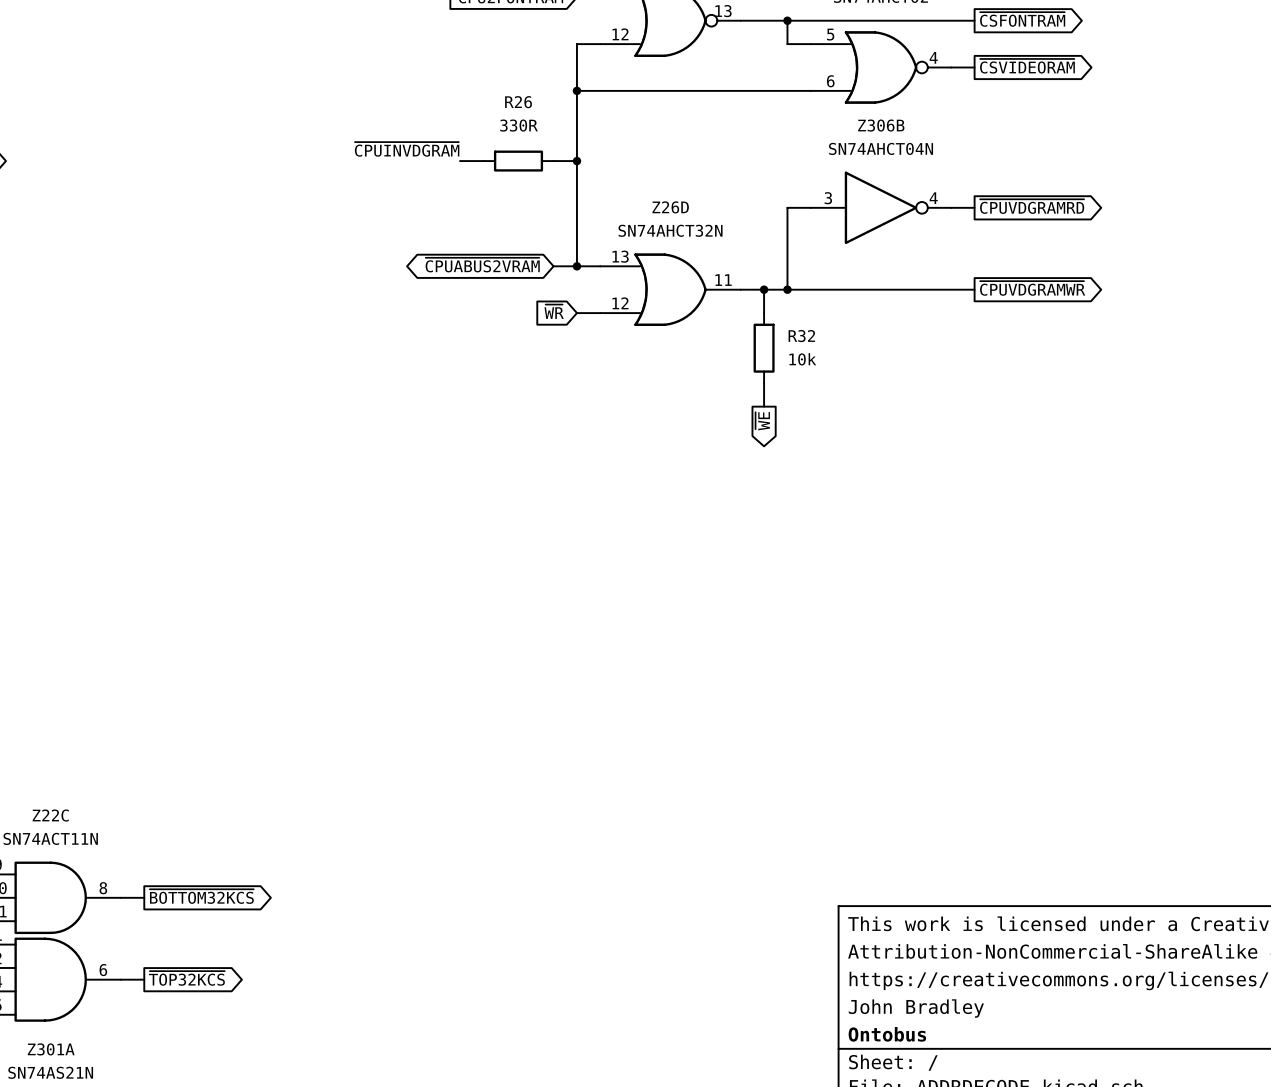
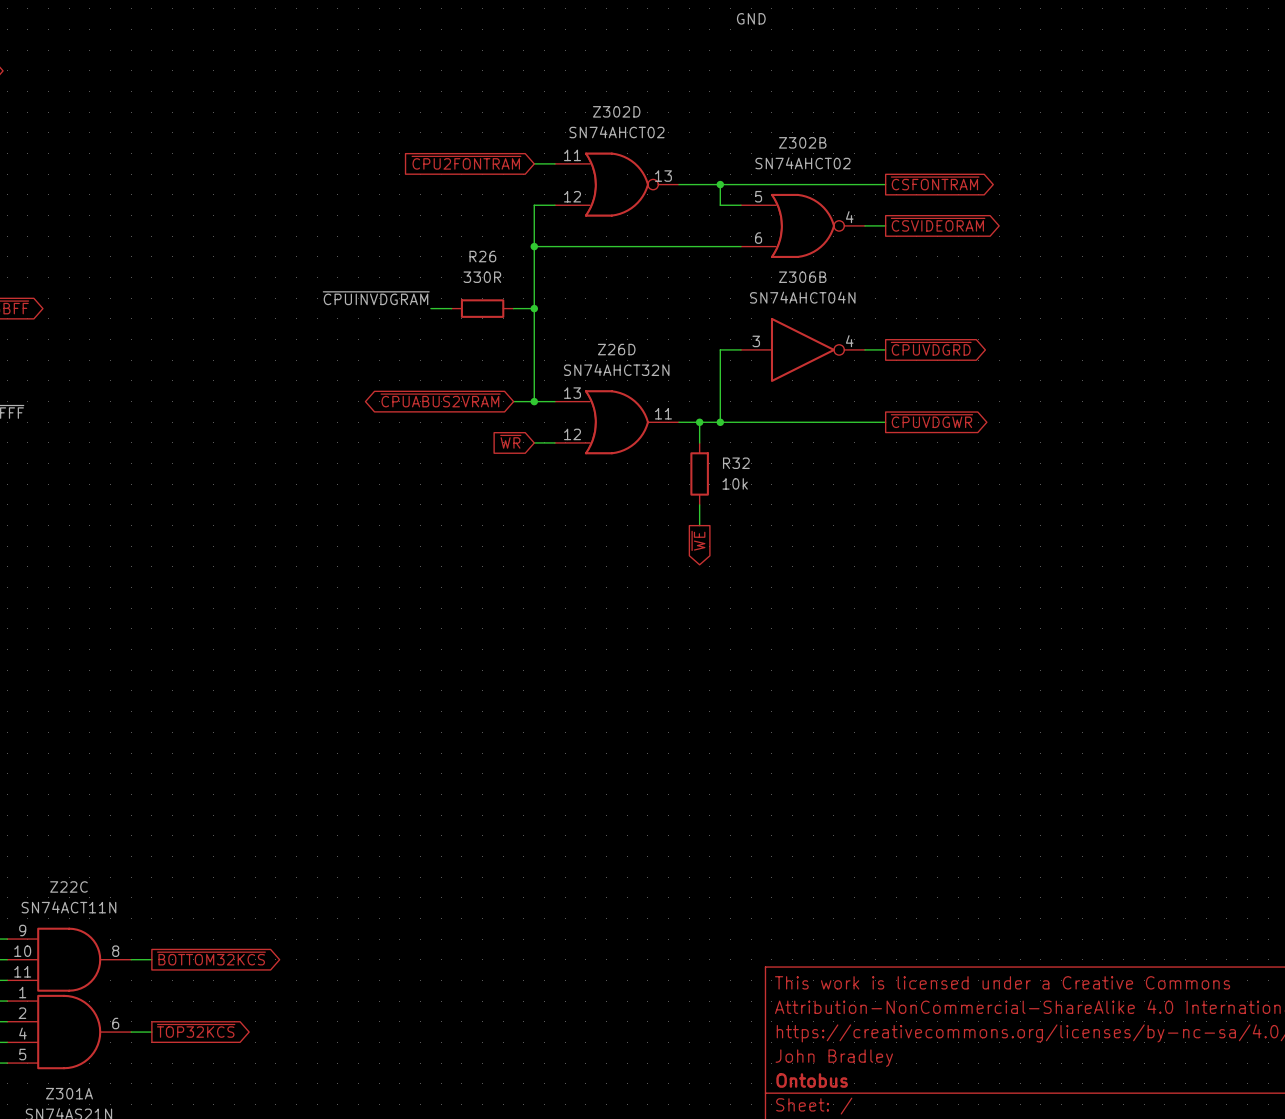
global label: ~{CPUVDGRAMRD} (1032, 206) -> ~{CPUVDGRD} (931, 348)
global label: ~{CPUVDGRAMWR} (1032, 288) -> ~{CPUVDGWR} (931, 421)

